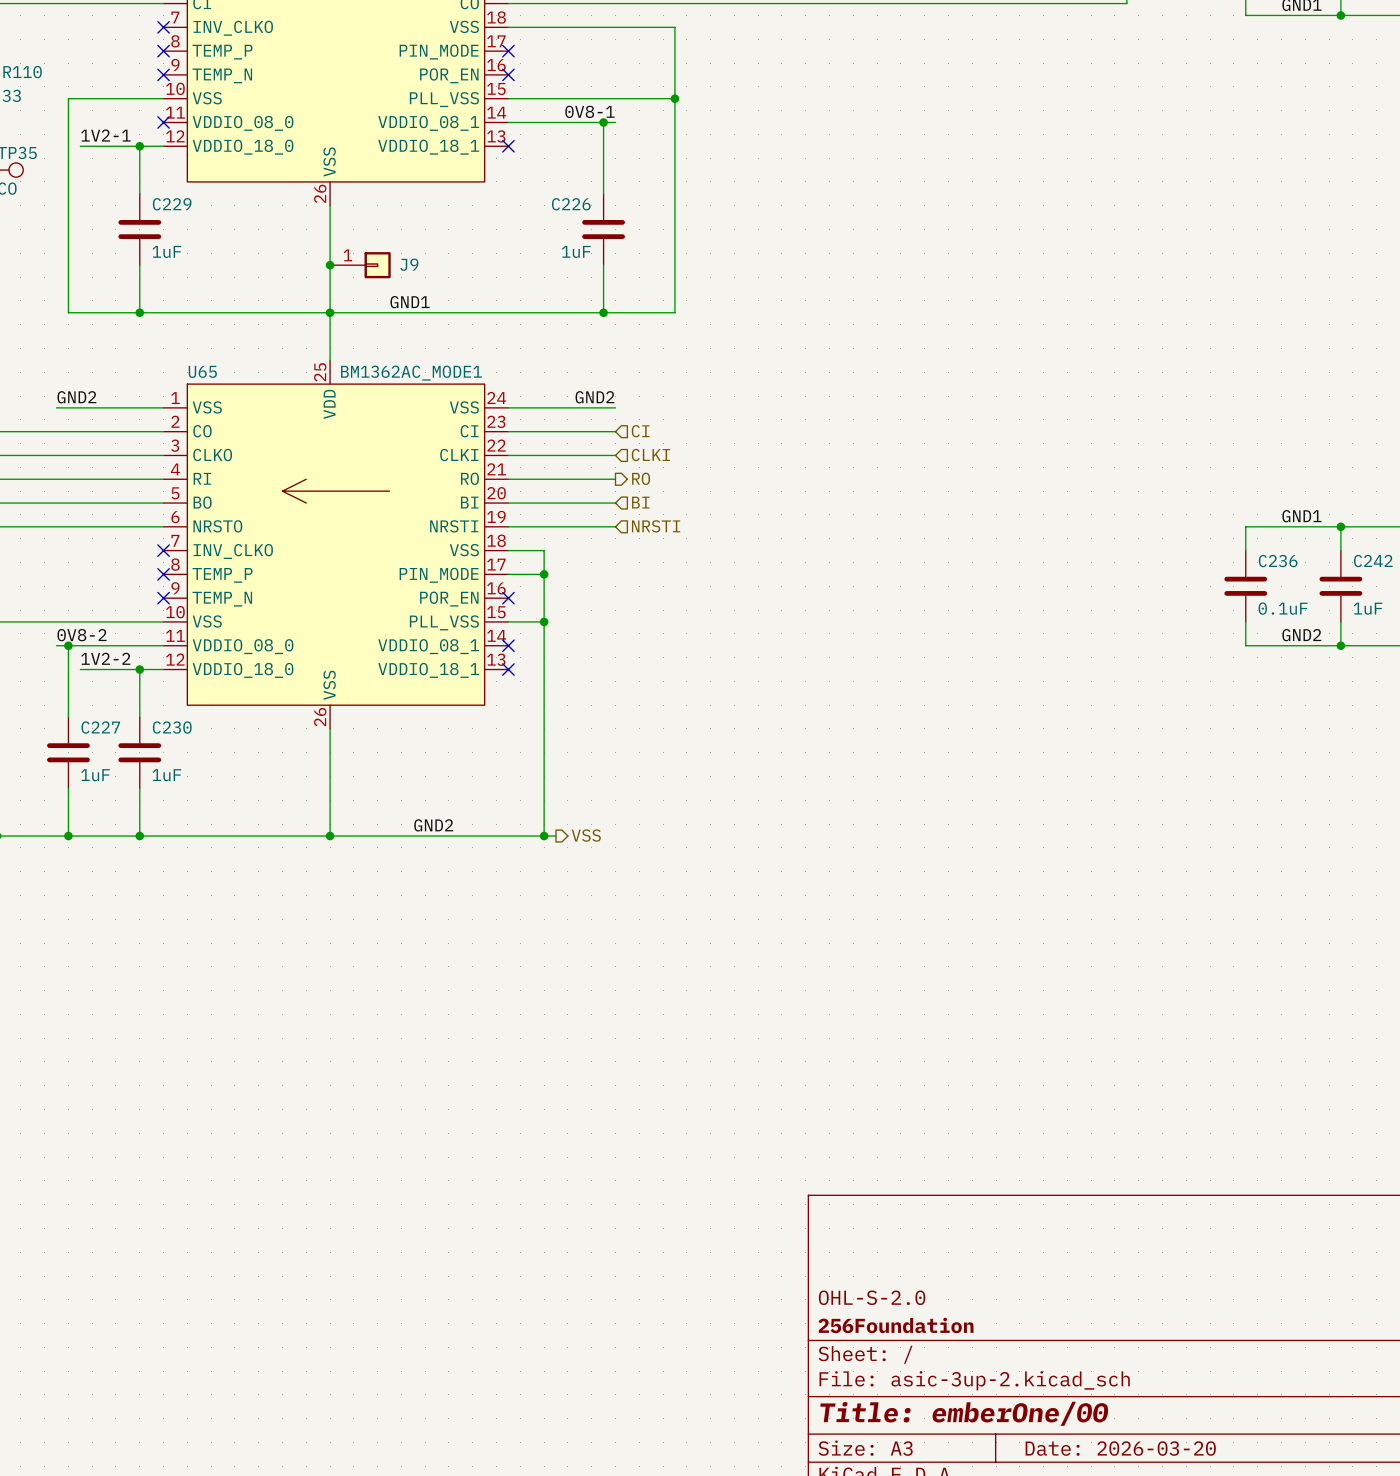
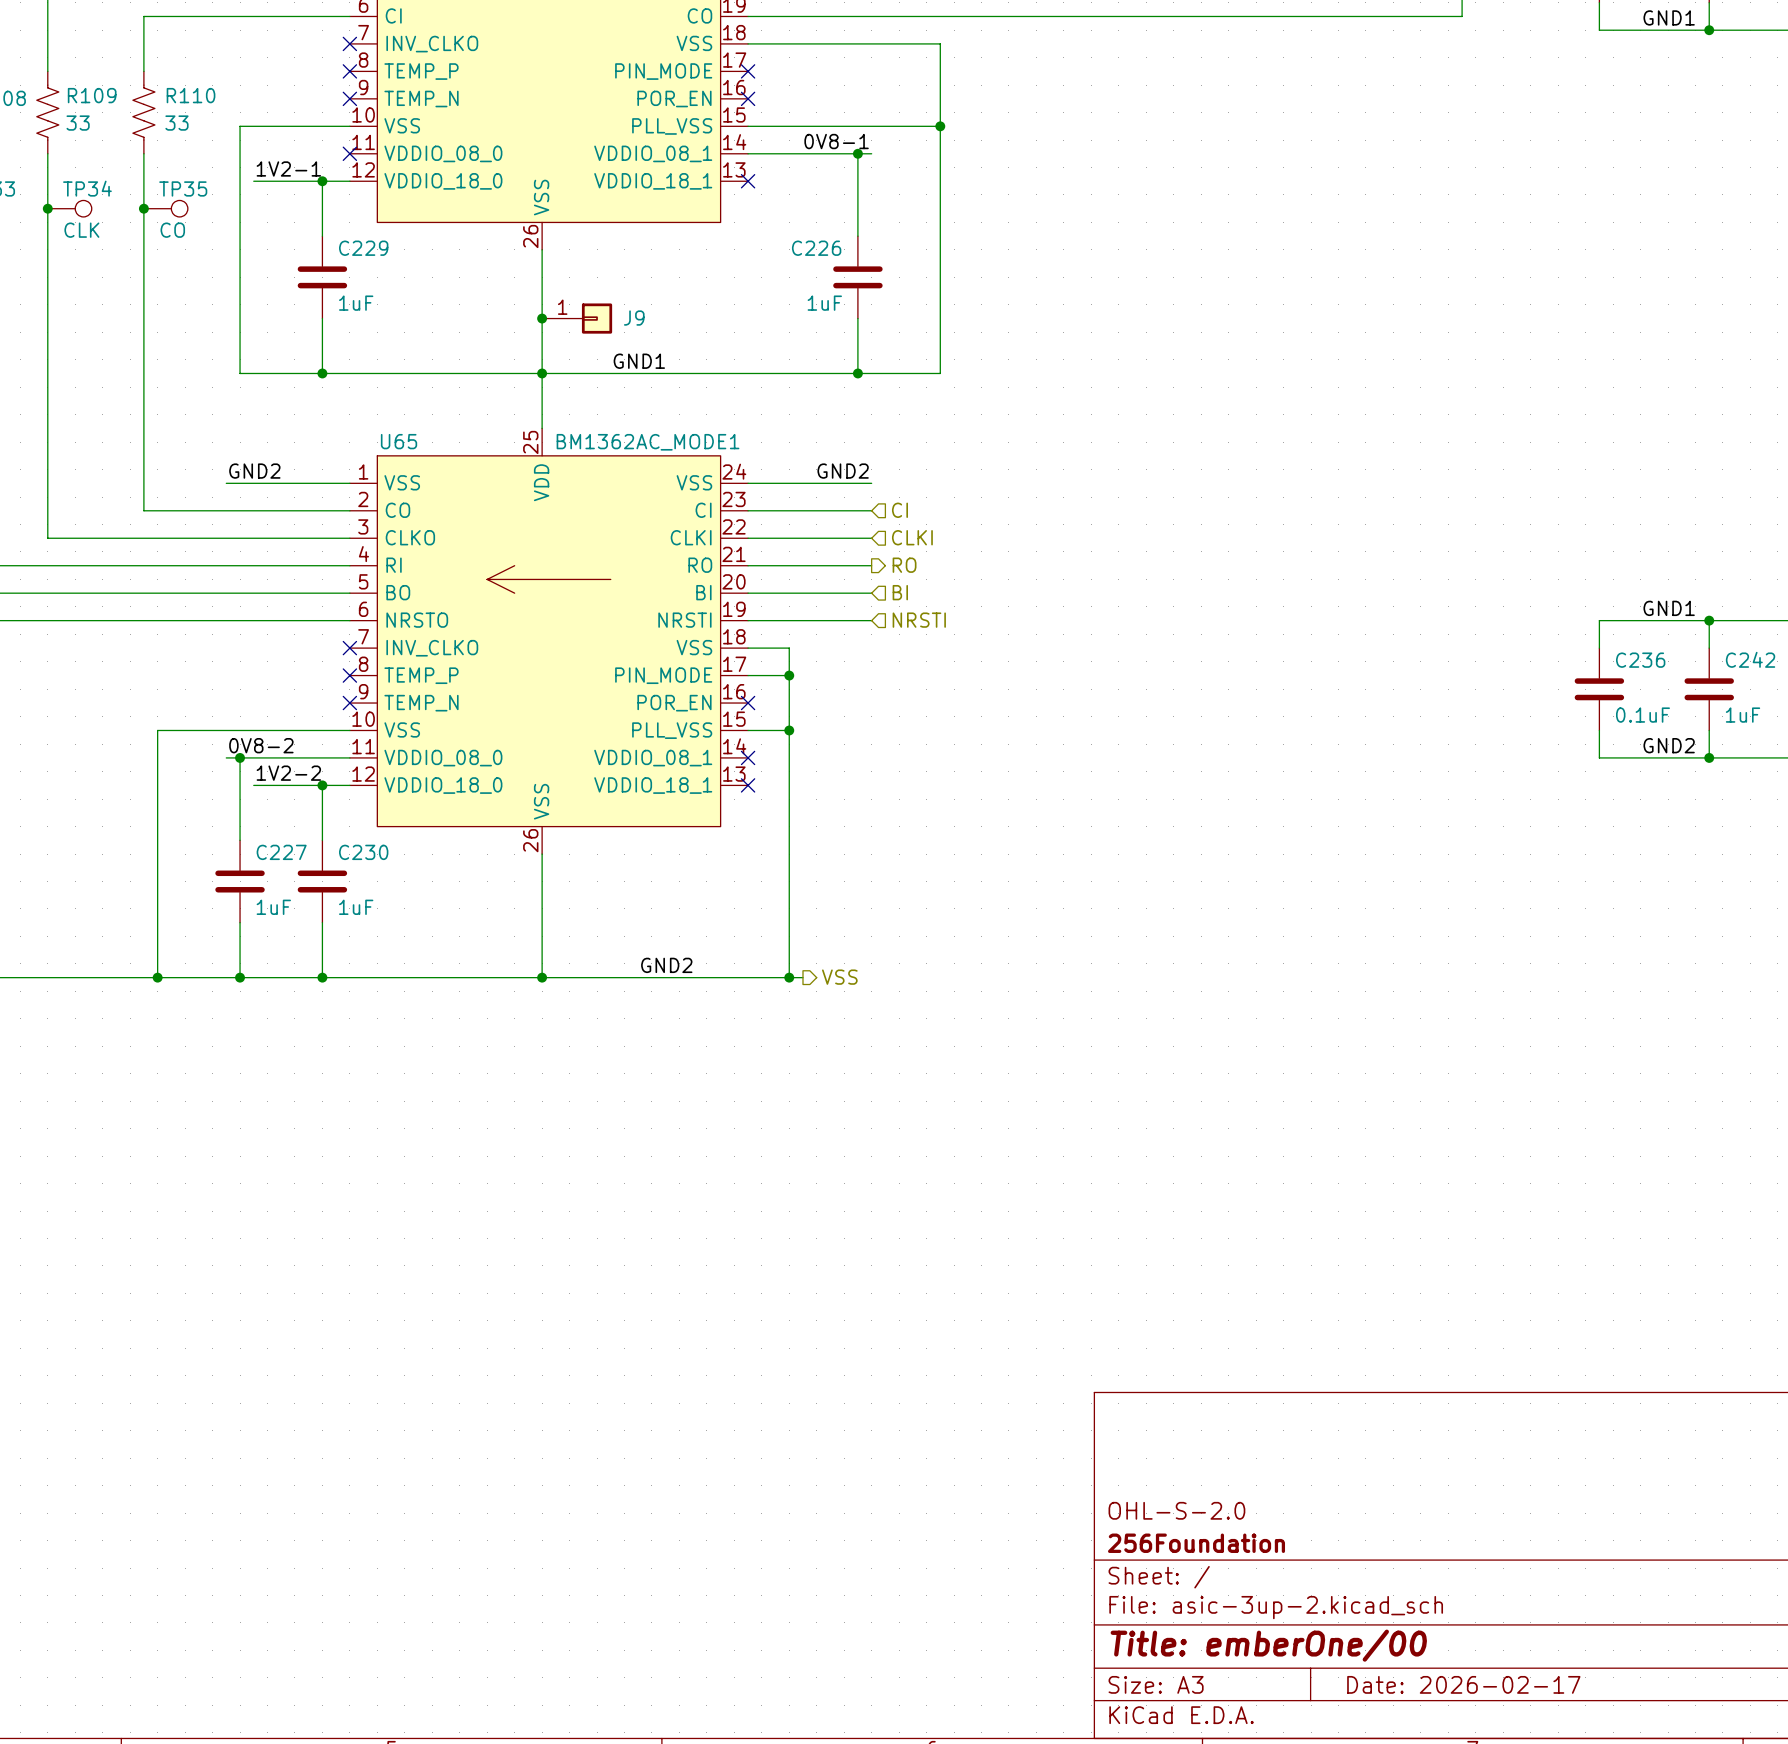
title block: Date: 2026-03-20 (1120, 1448) -> Date: 2026-02-17 (1463, 1684)

